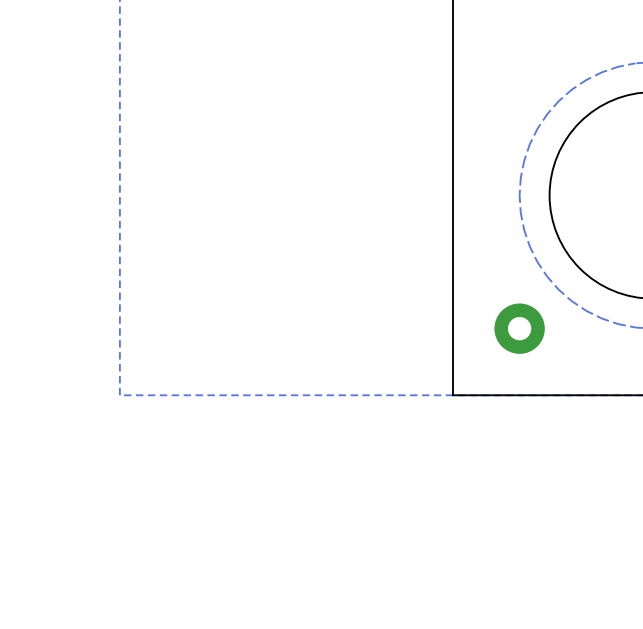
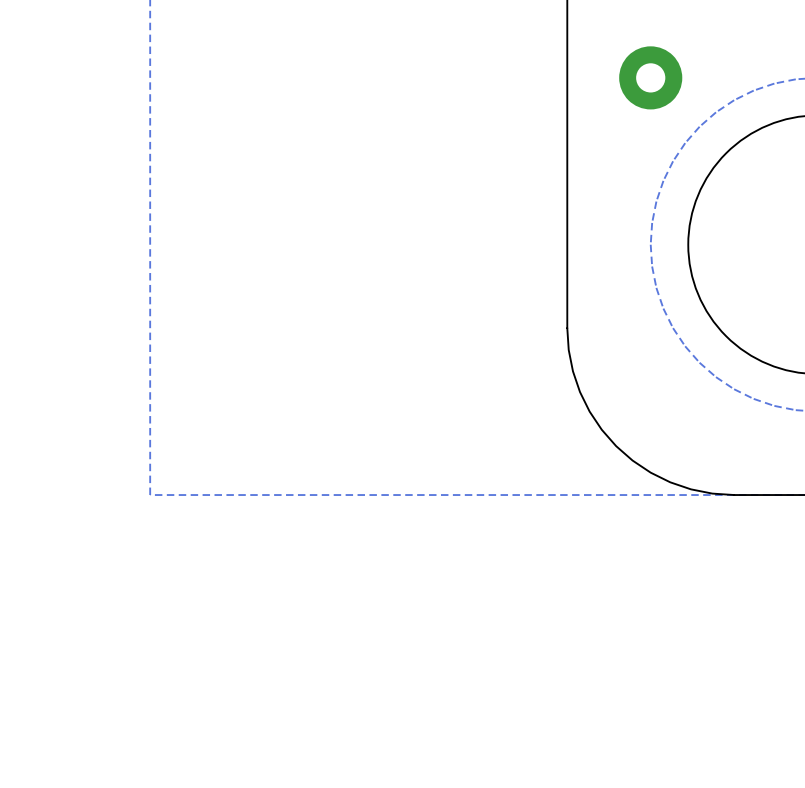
board edge: (453, 262) (453, 395) (586, 395) -> (567, 328) (572, 371) (579, 392) (589, 411) (616, 446) (650, 472) (670, 482) (690, 489) (734, 495)
via position: (519, 328) -> (650, 77)

